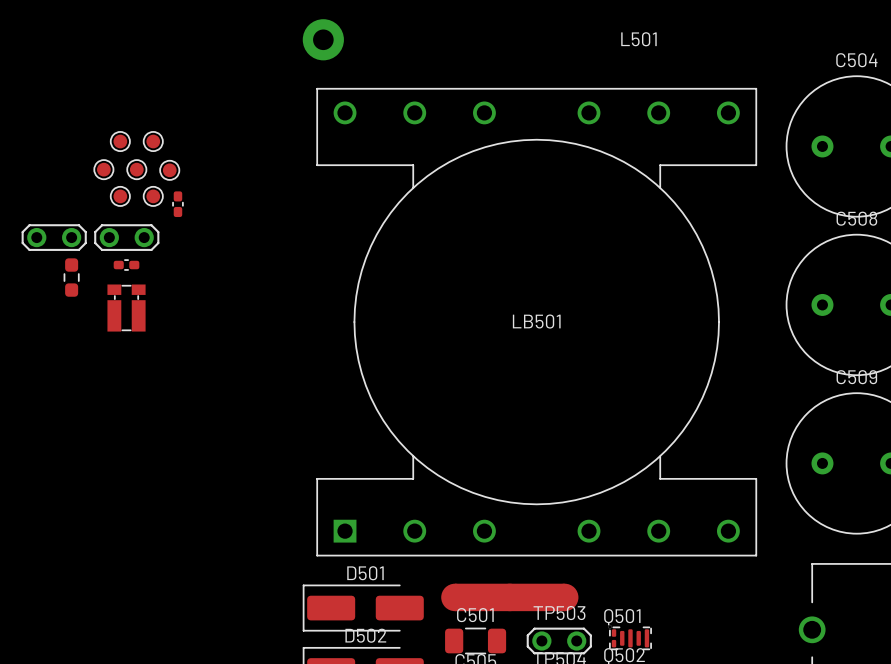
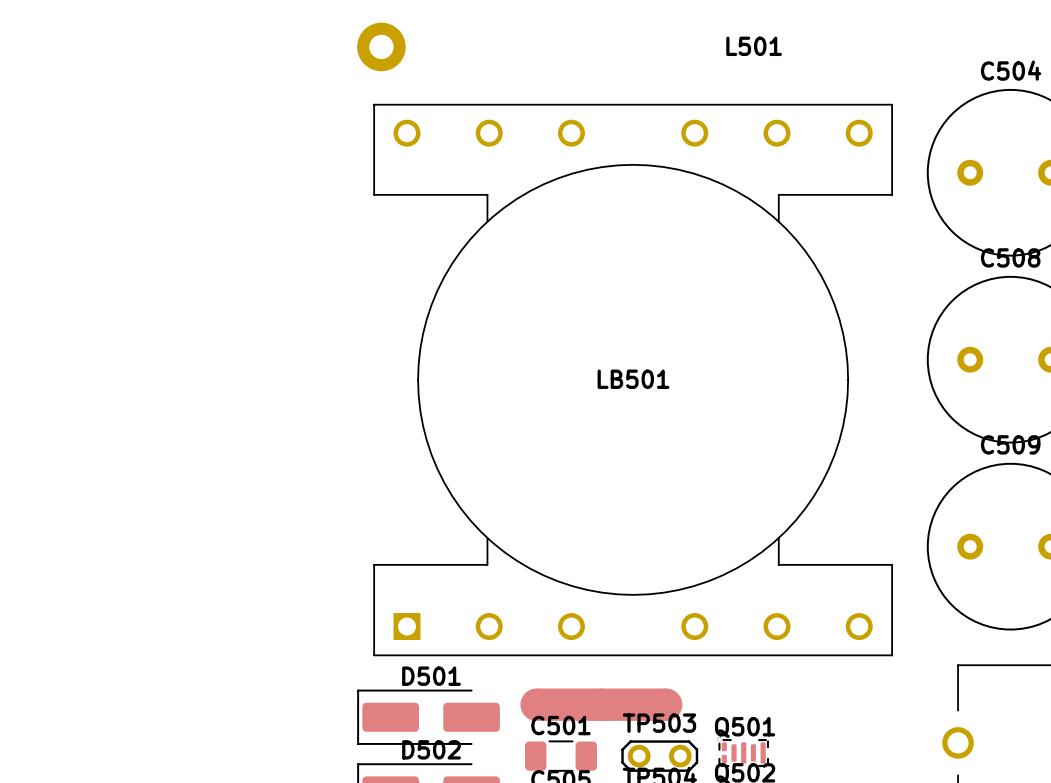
part: (120, 141) -> none
part: (153, 141) -> none
part: (103, 169) -> none
part: (136, 169) -> none
part: (169, 170) -> none
part: (120, 196) -> none
part: (153, 196) -> none
part: (177, 204) -> none
part: (54, 237) -> none
part: (126, 237) -> none
part: (126, 265) -> none
part: (71, 277) -> none
part: (126, 308) -> none

